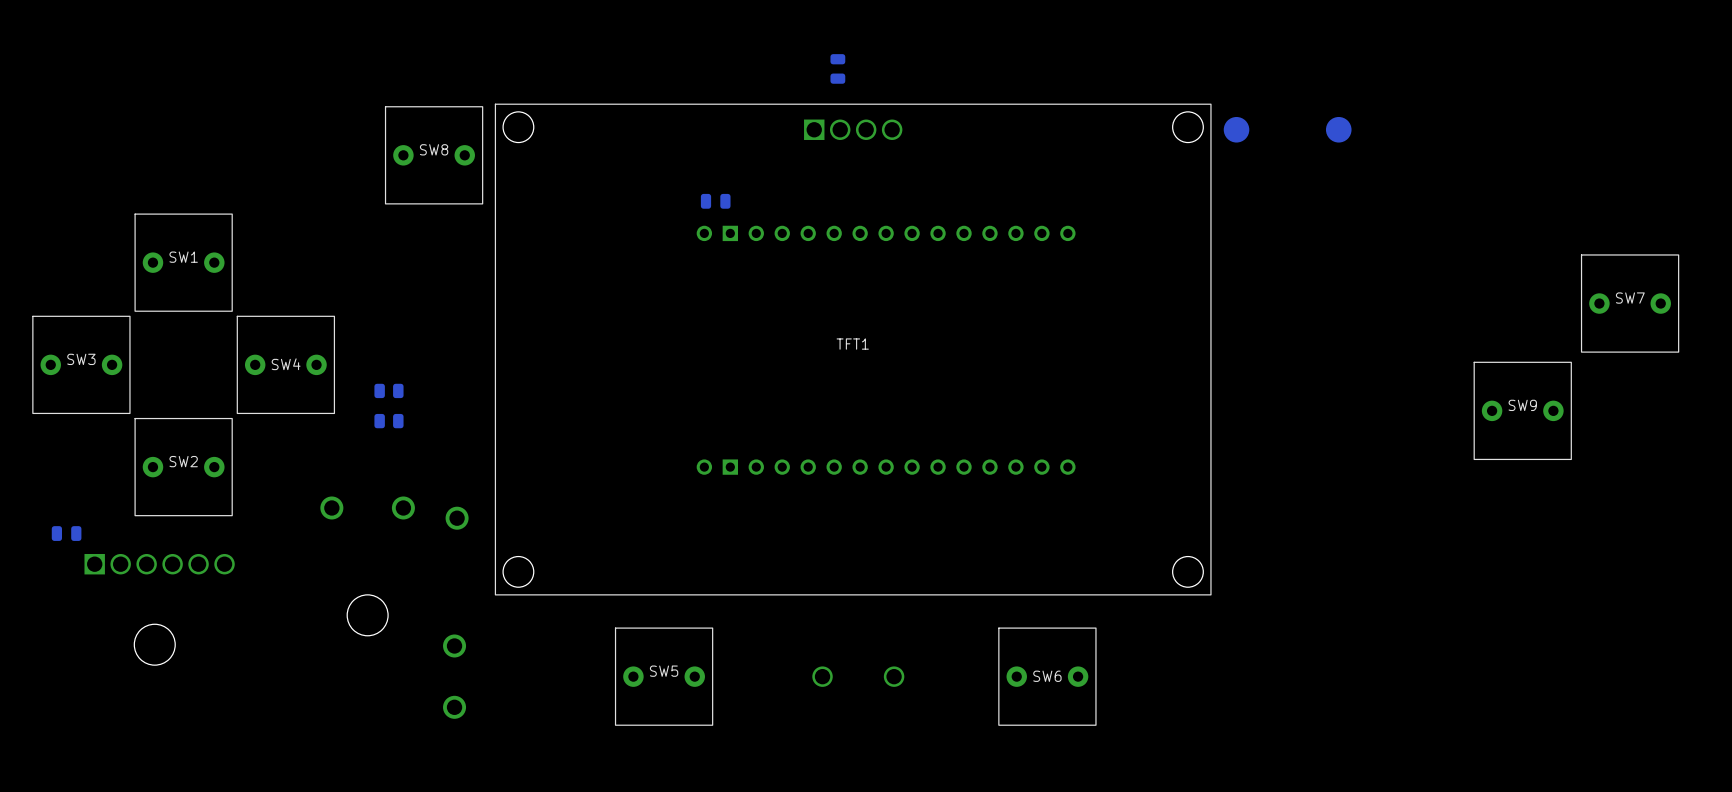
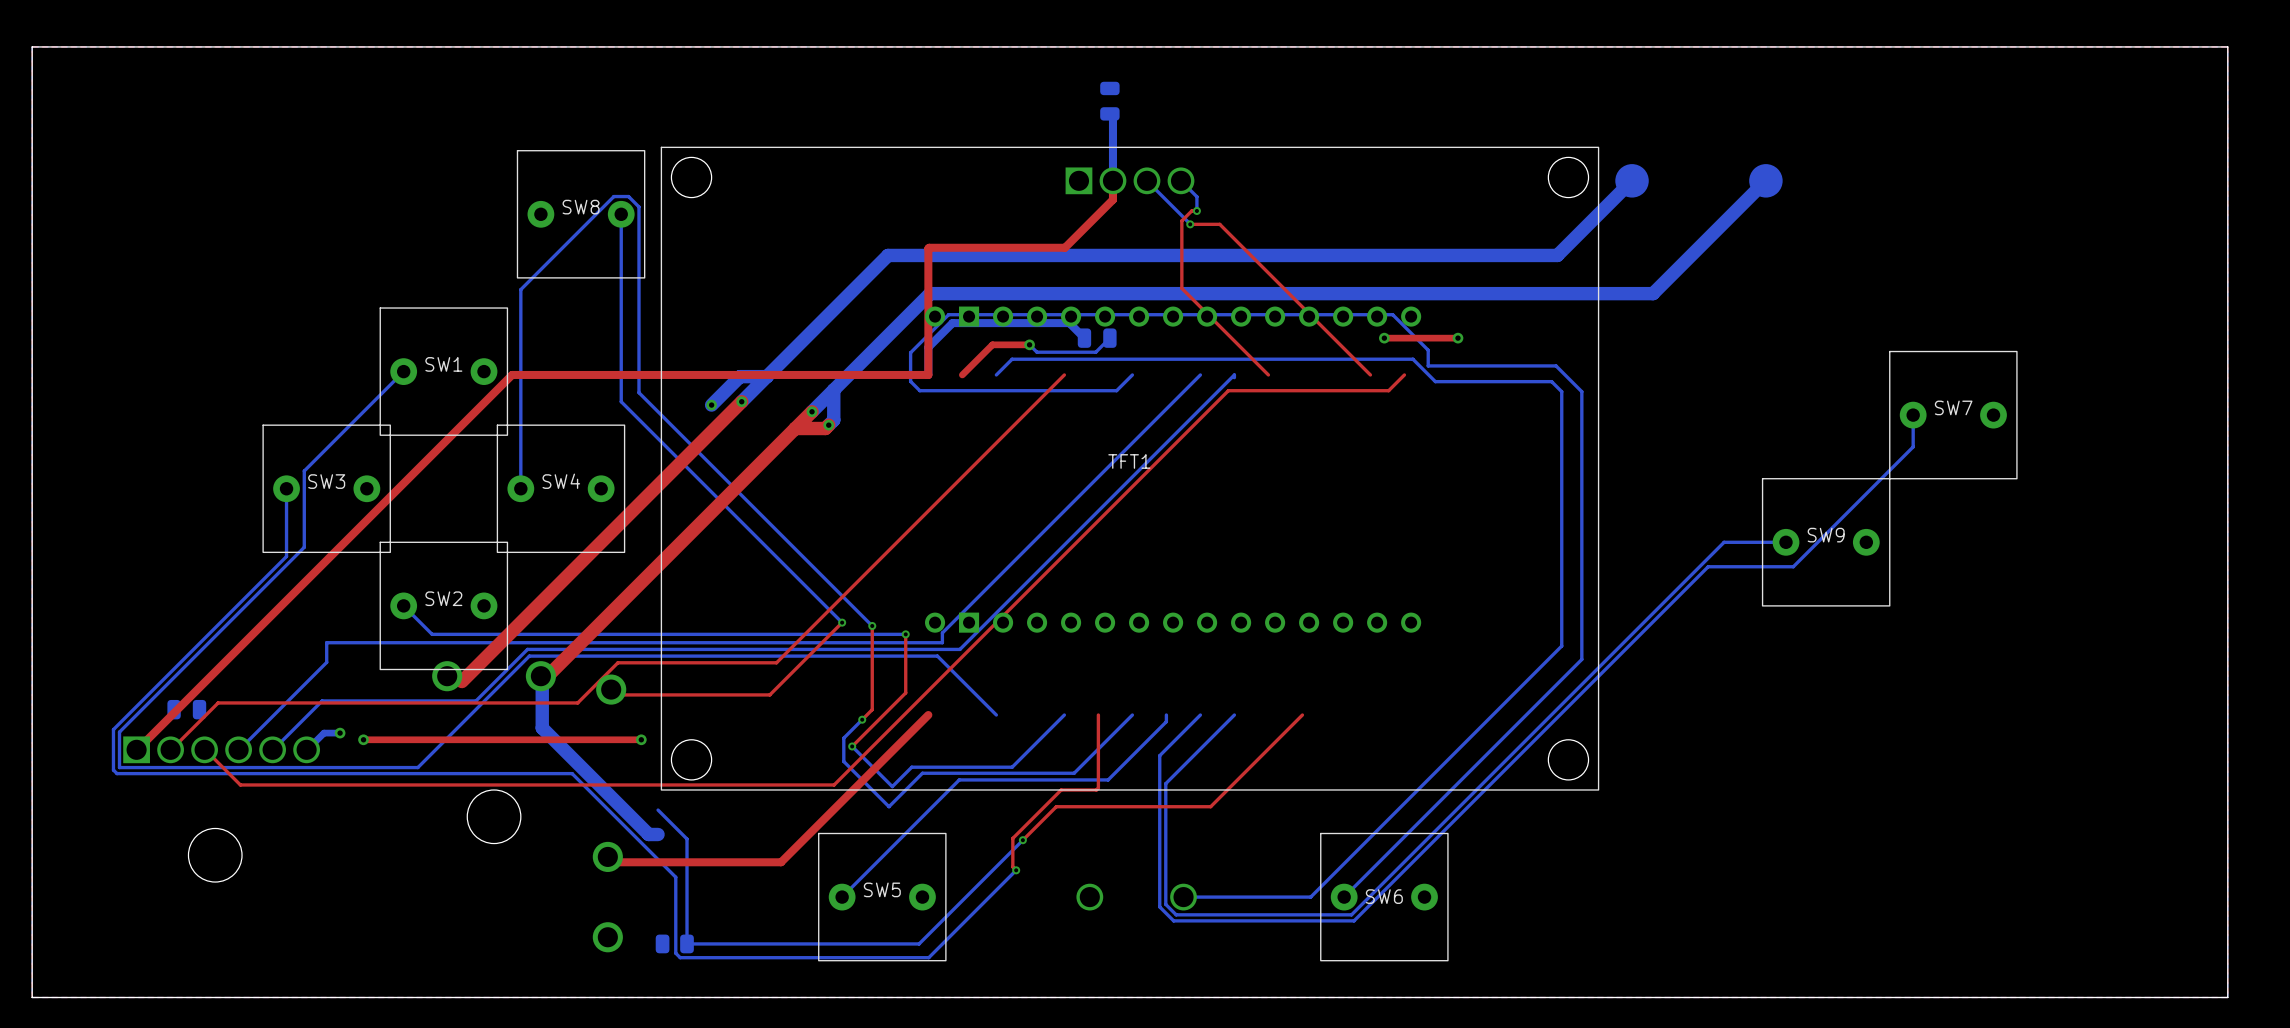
board edge: none -> (32, 46) (2227, 46) (2227, 997) (32, 997) (32, 46)
bottom track: none -> (1109, 113) (1112, 116) (1112, 180) (1116, 180)
top track: none -> (1112, 180) (1112, 199) (1064, 247) (928, 248) (928, 374) (512, 374) (137, 749)
bottom track: none -> (1146, 180) (1190, 224)
bottom track: none -> (1180, 180) (1196, 196) (1196, 210)
bottom track: none -> (1632, 180) (1557, 255) (888, 255) (741, 401)
bottom track: none -> (1765, 180) (1653, 293) (930, 293) (812, 411)
top track: none -> (1196, 210) (1191, 210) (1181, 220) (1181, 288) (1268, 374)
via: none -> (1196, 210)
bottom track: none -> (621, 214) (621, 401) (842, 622)
top track: none -> (1190, 224) (1219, 224) (1370, 374)
via: none -> (1190, 224)
part position: (715, 201) -> (1097, 338)
bottom track: none -> (1084, 338) (1069, 323) (952, 323) (928, 347) (928, 374)
bottom track: none -> (1109, 338) (1095, 352) (1036, 352) (1029, 344)
top track: none -> (1384, 338) (1457, 338)
via: none -> (1384, 338)
via: none -> (1457, 338)
top track: none -> (1029, 344) (992, 344) (962, 374)
via: none -> (1029, 344)
SW1 position: (183, 262) -> (443, 371)
bottom track: none -> (403, 371) (304, 471) (304, 547) (119, 732) (119, 767) (417, 767) (529, 656) (937, 656) (996, 715)
bottom track: none -> (996, 374) (1012, 359) (1412, 359) (1435, 381) (1551, 381) (1561, 391) (1561, 646) (1310, 897) (1183, 897)
top track: none -> (1064, 374) (776, 662) (617, 662) (577, 702) (218, 702) (171, 749)
bottom track: none -> (1132, 374) (1116, 390) (919, 390) (910, 381) (910, 352) (948, 314) (1392, 314) (1428, 350) (1428, 365) (1556, 365) (1581, 391) (1581, 659) (1344, 897)
bottom track: none -> (1200, 374) (942, 632) (942, 642) (326, 642) (326, 662) (239, 749) (243, 749)
top track: none -> (1404, 374) (1388, 390) (1228, 390) (834, 784) (240, 784) (205, 749)
bottom track: none -> (766, 376) (740, 376) (711, 405)
bottom track: none -> (1234, 377) (1234, 374) (959, 649) (527, 649) (475, 700) (322, 700) (273, 749)
bottom track: none -> (833, 390) (833, 420) (828, 425)
top track: none -> (741, 401) (461, 681)
via: none -> (741, 401)
via: none -> (711, 405)
SW7 position: (1630, 303) -> (1953, 415)
top track: none -> (812, 411) (542, 681)
via: none -> (812, 411)
bottom track: none -> (1913, 415) (1913, 446) (1793, 566) (1708, 566) (1354, 920) (1173, 920) (1159, 906) (1159, 755) (1200, 715)
top track: none -> (828, 425) (825, 428) (795, 428)
via: none -> (828, 425)
SW3 position: (81, 364) -> (326, 488)
bottom track: none -> (286, 488) (286, 556) (113, 729) (113, 770) (117, 773) (572, 773) (675, 877) (675, 953) (680, 957) (928, 957) (1016, 870)
SW4 position: (285, 364) -> (560, 488)
SW4 name position: SW4 (286, 364) -> SW4 (561, 481)
bottom track: none -> (520, 488) (520, 289) (613, 196) (628, 196) (638, 206) (638, 392) (872, 625)
part: (388, 390) -> none
bottom track: none -> (1785, 542) (1724, 542) (1351, 914) (1176, 914) (1165, 904) (1165, 783) (1234, 715)
SW9 position: (1522, 410) -> (1826, 542)
part: (388, 421) -> none
bottom track: none -> (403, 605) (432, 634) (905, 634)
SW2 position: (183, 467) -> (443, 605)
top track: none -> (842, 622) (769, 694) (619, 694)
via: none -> (842, 622)
top track: none -> (872, 625) (872, 709) (862, 719)
via: none -> (872, 625)
top track: none -> (905, 634) (905, 692) (852, 746)
via: none -> (905, 634)
bottom track: none -> (542, 681) (542, 728) (648, 834) (658, 834)
part position: (66, 533) -> (186, 709)
top track: none -> (928, 715) (781, 862) (615, 862)
bottom track: none -> (1064, 715) (1012, 767) (911, 767) (892, 786) (852, 746)
top track: none -> (1098, 715) (1098, 788) (1096, 789) (1061, 789) (1012, 838) (1012, 866) (1016, 870)
bottom track: none -> (1132, 715) (1074, 773) (922, 773) (889, 806) (843, 761) (843, 738) (862, 719)
bottom track: none -> (1166, 715) (1166, 721) (1108, 779) (959, 779) (842, 897)
top track: none -> (1302, 715) (1210, 806) (1056, 806) (1022, 840)
via: none -> (862, 719)
bottom track: none -> (340, 733) (324, 733) (307, 749)
via: none -> (340, 733)
top track: none -> (363, 739) (641, 739)
via: none -> (363, 739)
via: none -> (641, 739)
via: none -> (852, 746)
bottom track: none -> (658, 810) (687, 839) (687, 943) (919, 943) (1022, 840)
via: none -> (1022, 840)
via: none -> (1016, 870)
part: none -> (674, 943)

